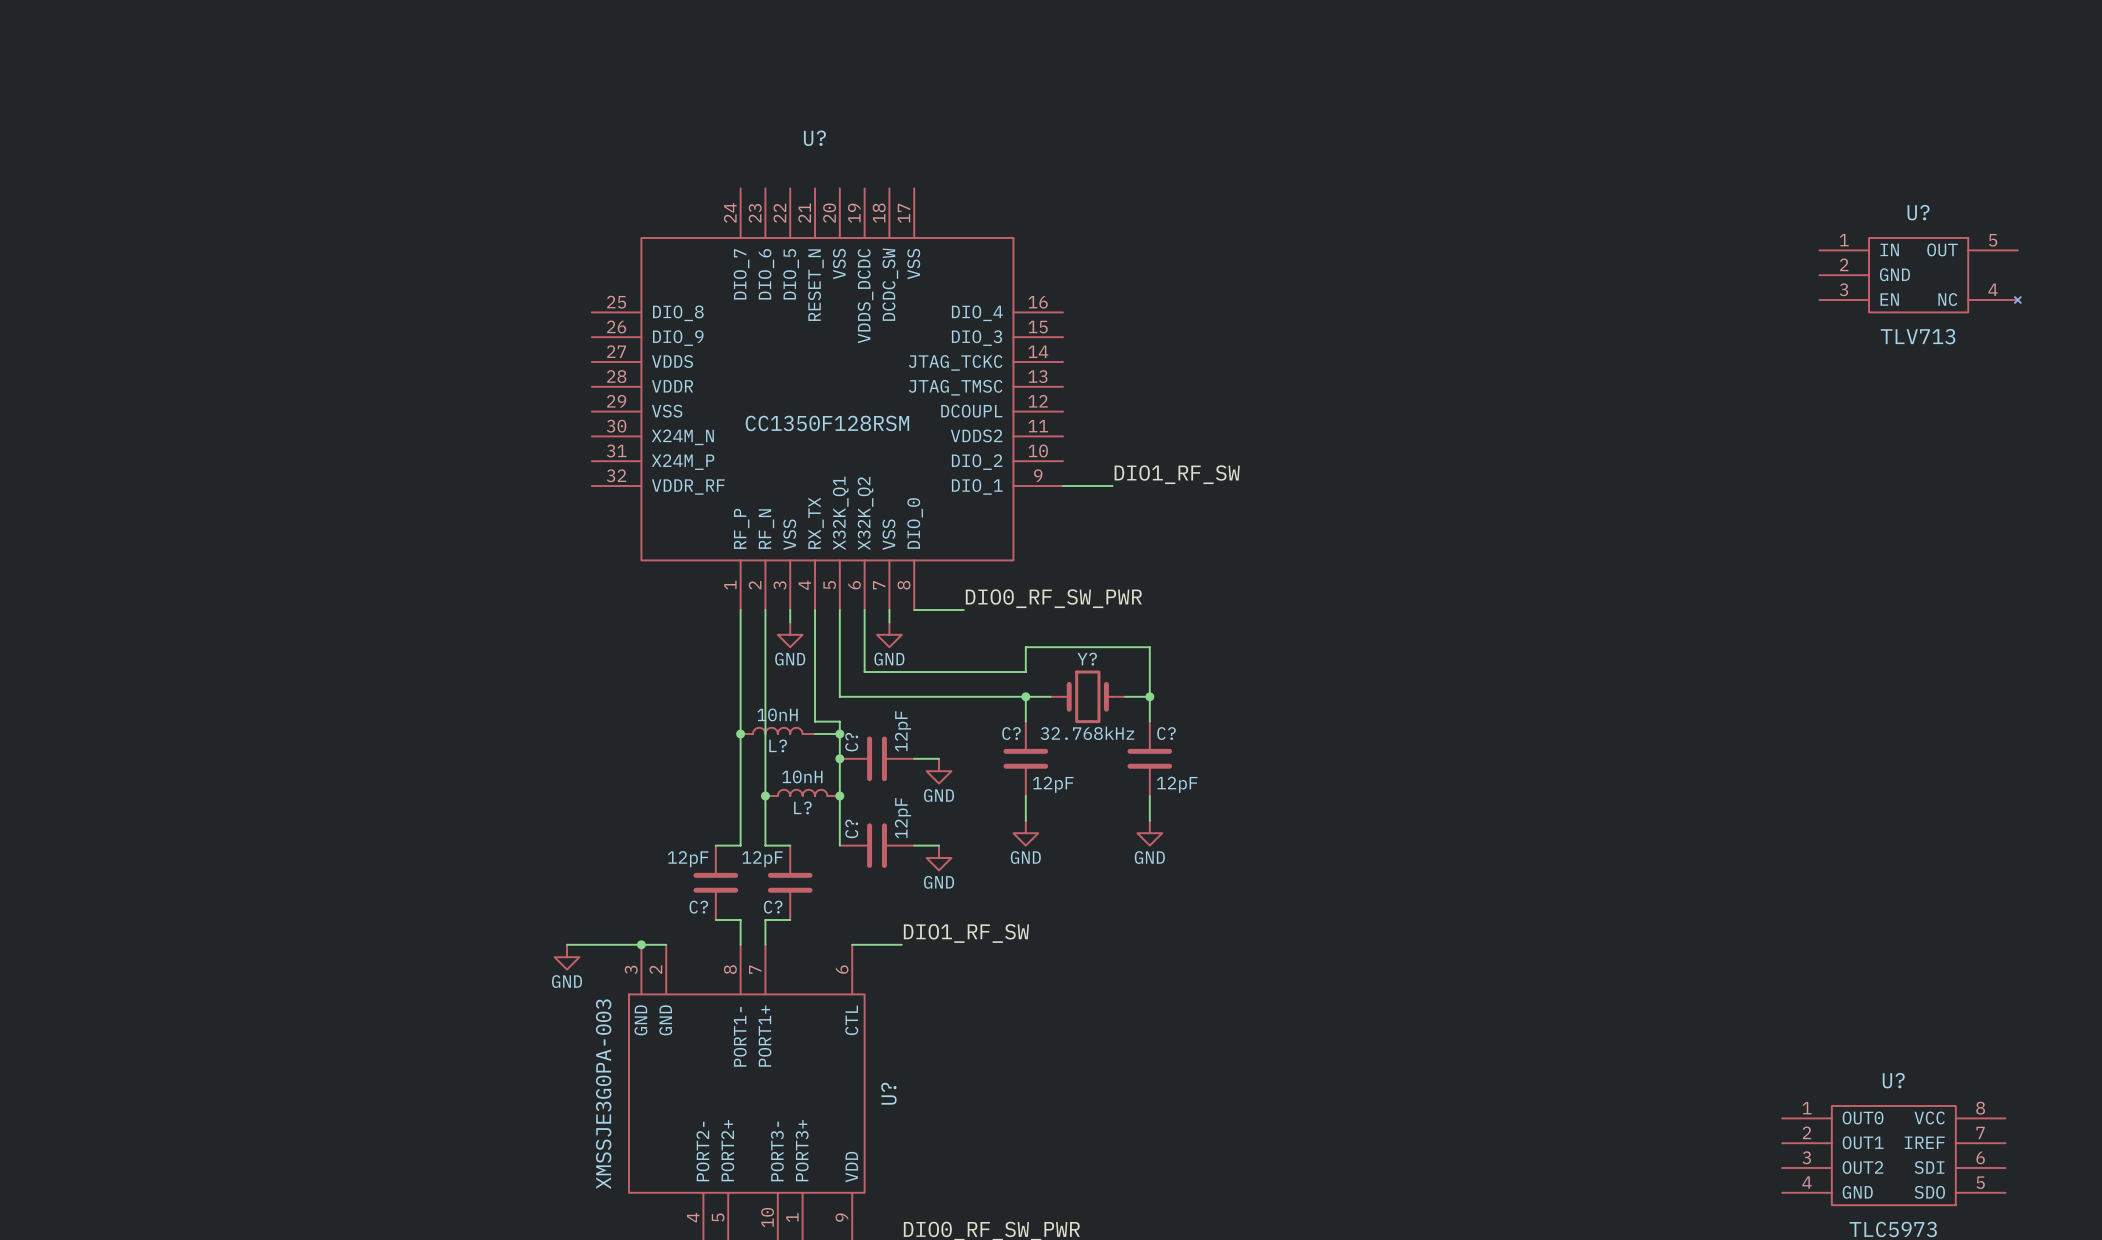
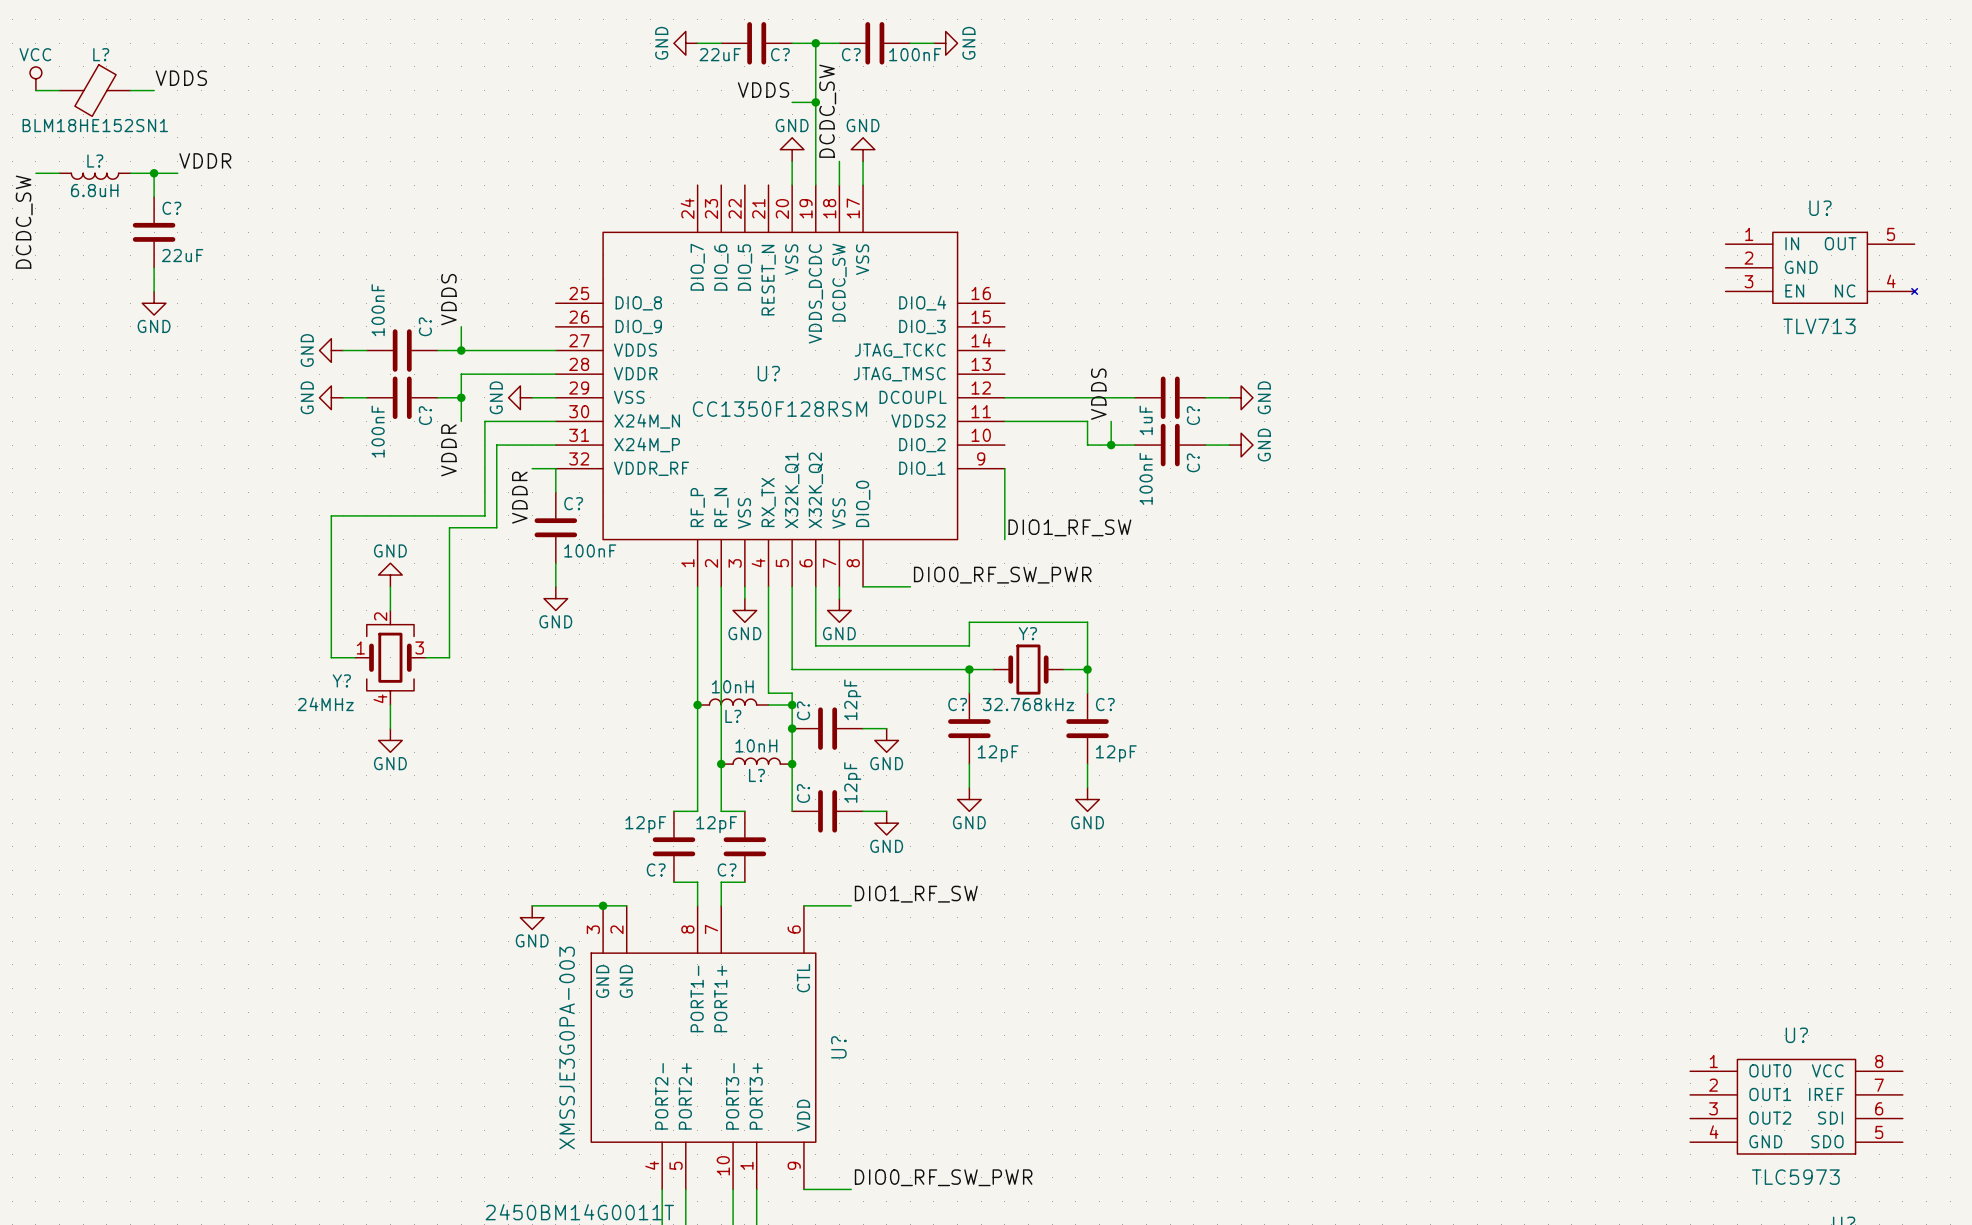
power symbol: none -> GND (685, 43)
wire: none -> (697, 43) (721, 43)
C?: none -> 22uF (756, 43)
wire: none -> (792, 43) (839, 43)
wire: none -> (815, 43) (815, 185)
junction: none -> (815, 43)
C?: none -> 100nF (874, 43)
wire: none -> (910, 43) (933, 43)
power symbol: none -> GND (945, 43)
power symbol: none -> VCC (35, 78)
label: none -> VDDS (181, 78)
label: none -> VDDS (763, 90)
wire: none -> (35, 90) (59, 90)
L?: none -> BLM18HE152SN1 (95, 90)
wire: none -> (130, 90) (154, 90)
wire: none -> (792, 102) (815, 102)
junction: none -> (815, 102)
label: none -> DCDC_SW (827, 111)
U? name position: U? (814, 138) -> U? (768, 373)
power symbol: none -> GND (792, 149)
power symbol: none -> GND (863, 149)
label: none -> VDDR (205, 160)
wire: none -> (792, 161) (792, 185)
wire: none -> (839, 161) (839, 185)
wire: none -> (863, 161) (863, 185)
wire: none -> (35, 173) (59, 173)
wire: none -> (130, 173) (177, 173)
wire: none -> (154, 173) (154, 196)
junction: none -> (154, 173)
L?: none -> 6.8uH (95, 176)
label: none -> DCDC_SW (24, 222)
C?: none -> 22uF (154, 232)
wire: none -> (154, 267) (154, 291)
label: none -> VDDS (448, 299)
power symbol: none -> GND (154, 303)
wire: none -> (461, 326) (461, 350)
power symbol: none -> GND (331, 350)
wire: none -> (343, 350) (366, 350)
C?: none -> 100nF (402, 350)
wire: none -> (437, 350) (555, 350)
junction: none -> (461, 350)
wire: none -> (555, 374) (461, 374) (461, 421)
power symbol: none -> GND (331, 397)
wire: none -> (343, 397) (366, 397)
C?: none -> 100nF (402, 397)
wire: none -> (437, 397) (461, 397)
junction: none -> (461, 397)
power symbol: none -> GND (520, 397)
wire: none -> (532, 397) (555, 397)
wire: none -> (1004, 397) (1134, 397)
label: none -> VDDS (1098, 394)
C?: none -> 1uF (1170, 397)
wire: none -> (1205, 397) (1229, 397)
power symbol: none -> GND (1241, 397)
wire: none -> (555, 421) (484, 421) (484, 515) (331, 515) (331, 657) (354, 657)
wire: none -> (1004, 421) (1087, 421) (1087, 445) (1134, 445)
wire: none -> (1111, 421) (1111, 445)
wire: none -> (555, 445) (496, 445) (496, 527) (449, 527) (449, 657) (425, 657)
junction: none -> (1111, 445)
C?: none -> 100nF (1170, 445)
wire: none -> (1205, 445) (1229, 445)
power symbol: none -> GND (1241, 445)
label: none -> VDDR (448, 450)
label position: DIO1_RF_SW (1177, 474) -> DIO1_RF_SW (1069, 527)
wire: none -> (532, 468) (555, 468) (555, 492)
wire: (1063, 486) (1112, 486) -> (1004, 468) (1004, 539)
label: none -> VDDR (519, 497)
C?: none -> 100nF (555, 527)
wire: none -> (555, 563) (555, 586)
power symbol: none -> GND (390, 575)
wire: none -> (390, 586) (390, 610)
power symbol: none -> GND (555, 598)
Y?: none -> 24MHz (390, 657)
wire: none -> (390, 704) (390, 728)
power symbol: none -> GND (390, 740)

